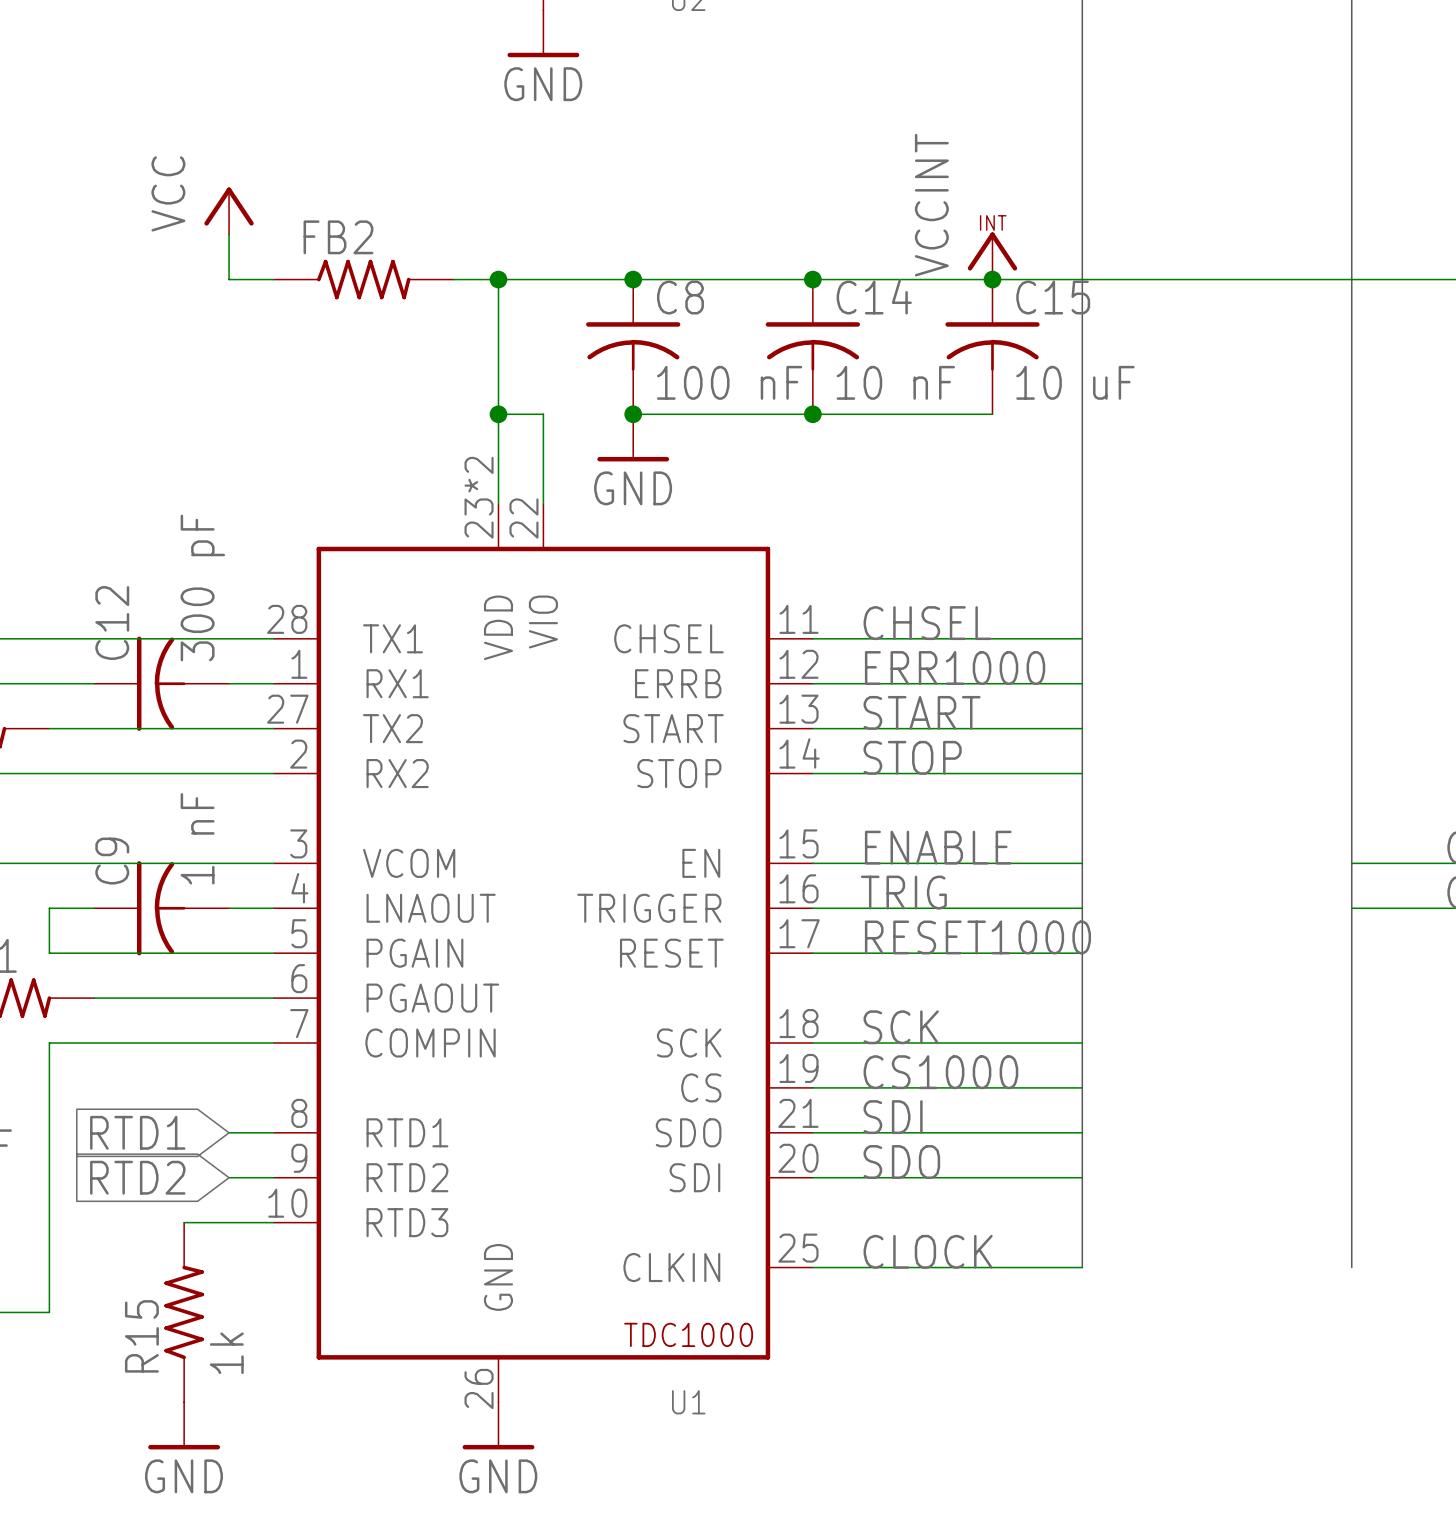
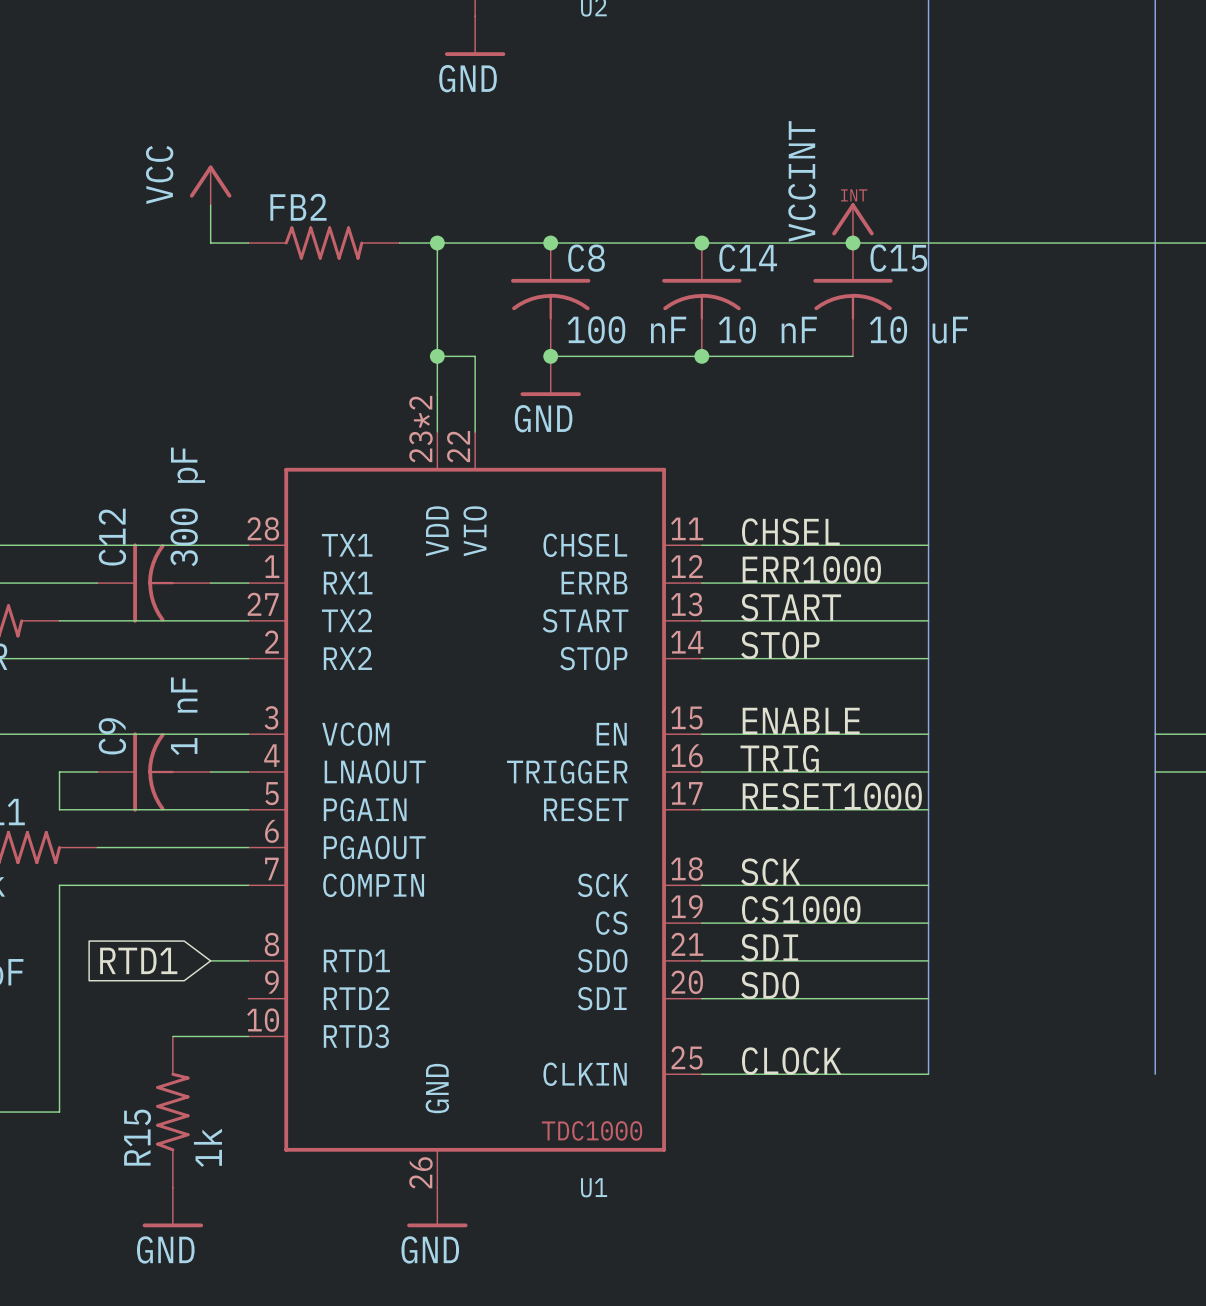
global label: RTD2 (137, 1177) -> none
wire: (229, 1177) (273, 1177) -> none

